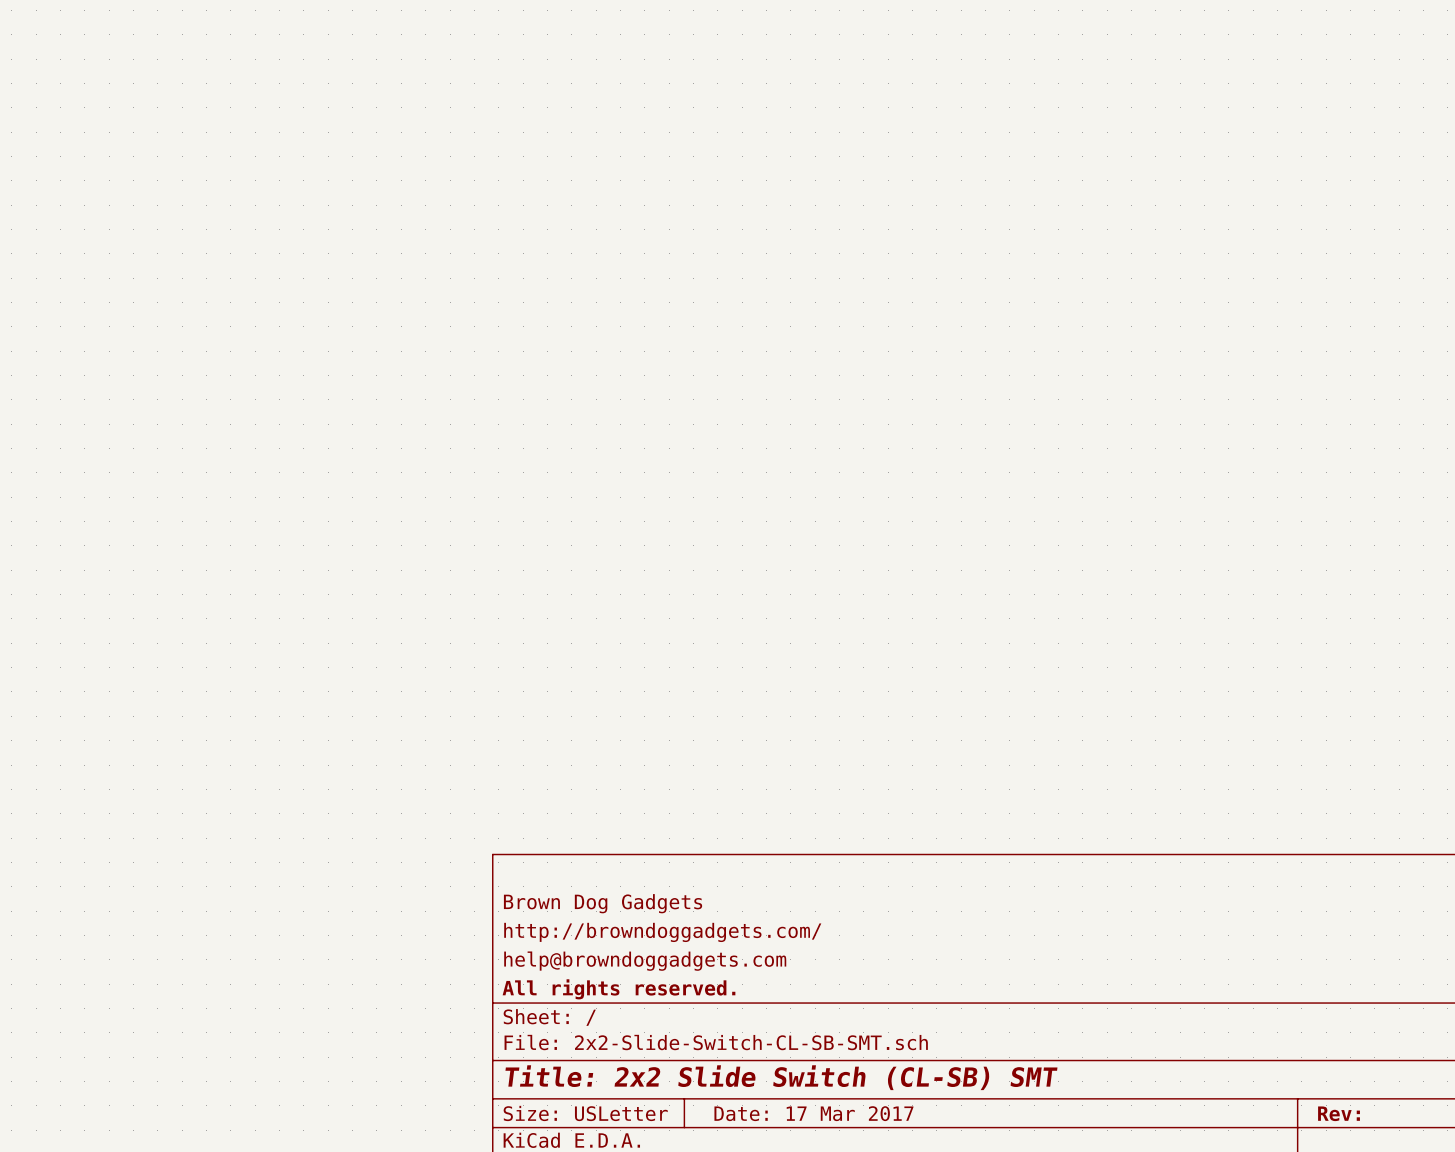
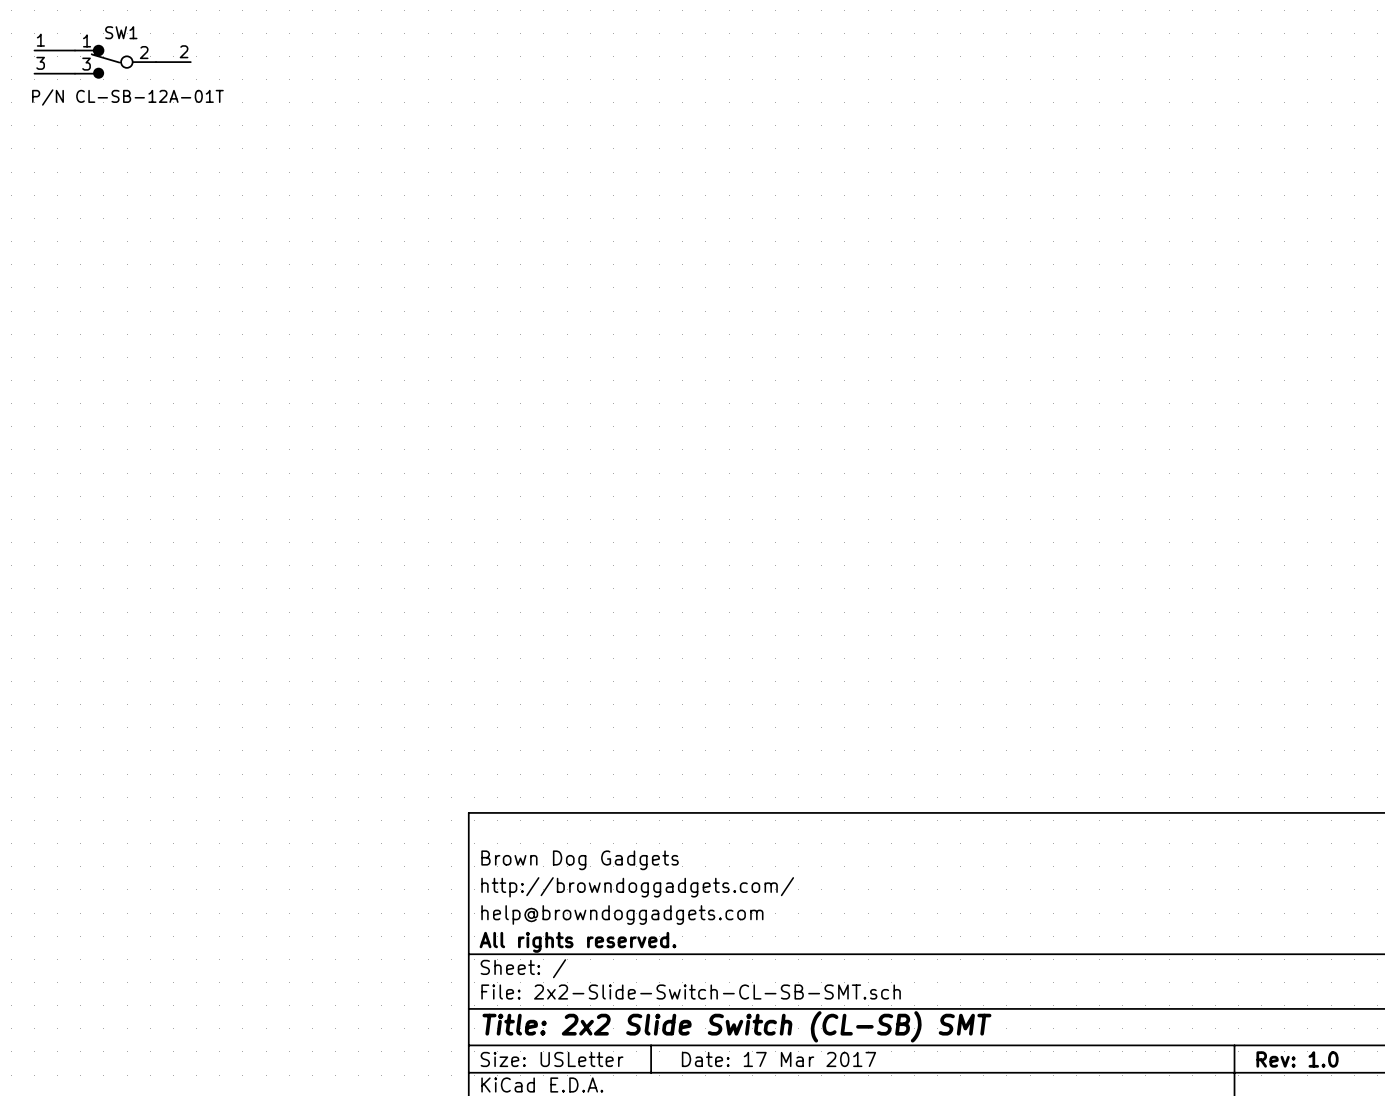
label: none -> 1 (40, 40)
wire: none -> (34, 50) (75, 50)
label: none -> 2 (184, 51)
SW1: none -> P/N CL-SB-12A-01T (115, 61)
wire: none -> (156, 62) (190, 62)
label: none -> 3 (40, 63)
wire: none -> (34, 73) (75, 73)
title block: Rev: (1339, 1113) -> Rev: 1.0 (1297, 1059)

